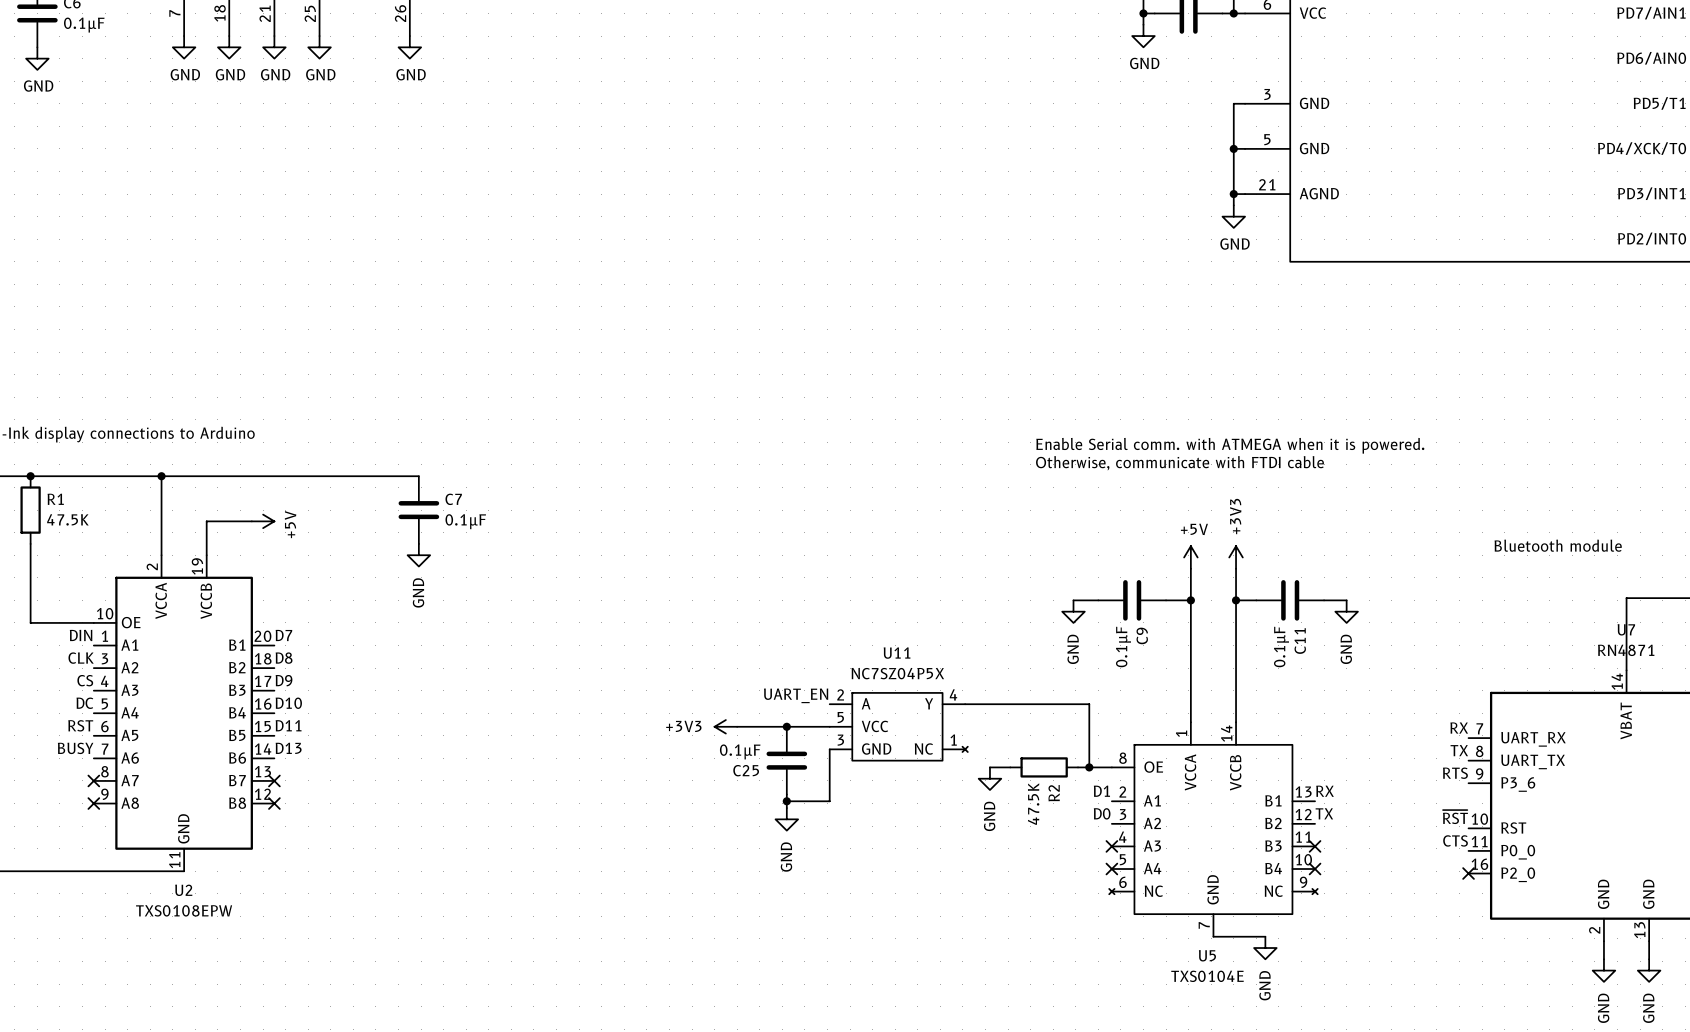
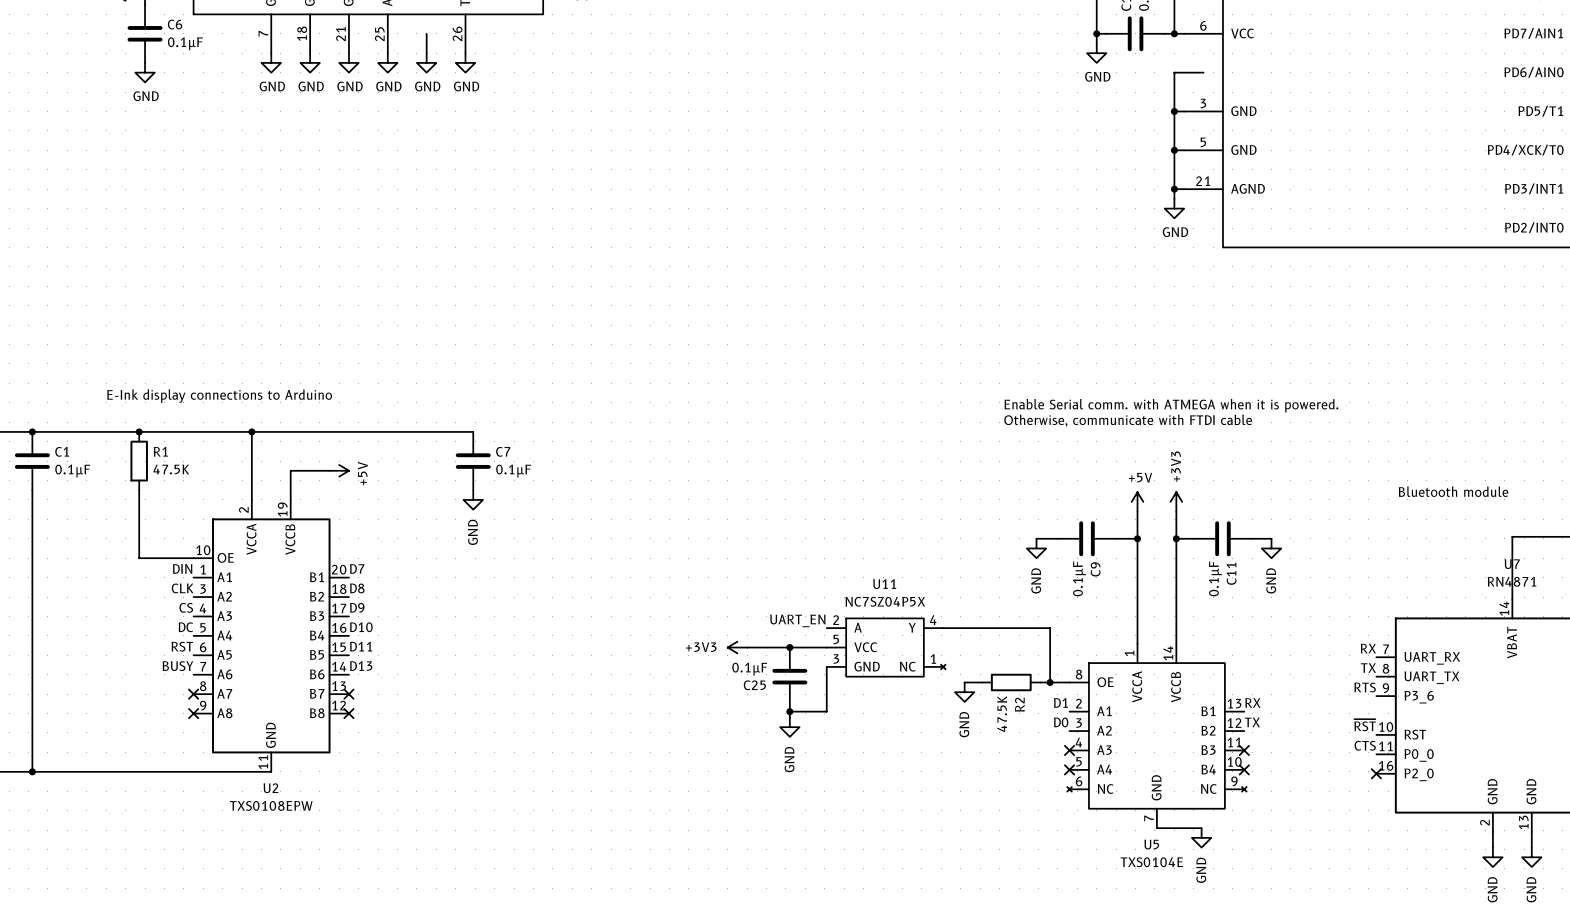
wire: none -> (426, 33) (426, 53)
power symbol: none -> GND (426, 62)
wire: none -> (1203, 72) (1174, 72) (1174, 111)
junction: none -> (1174, 111)

